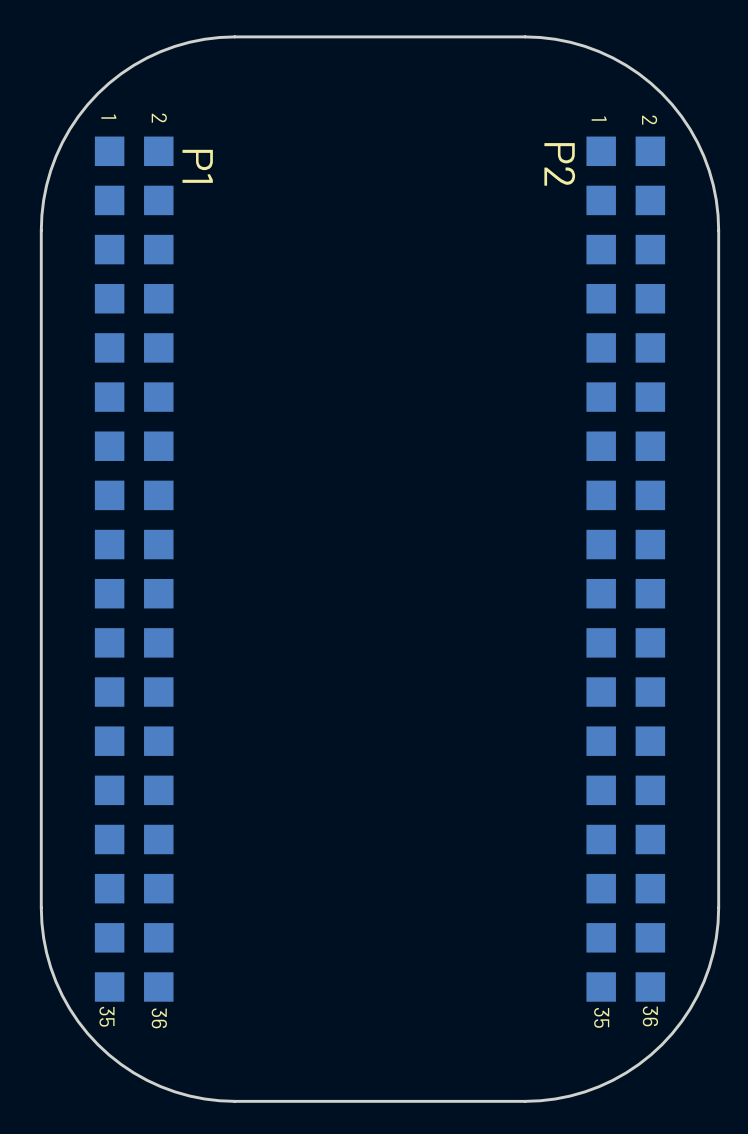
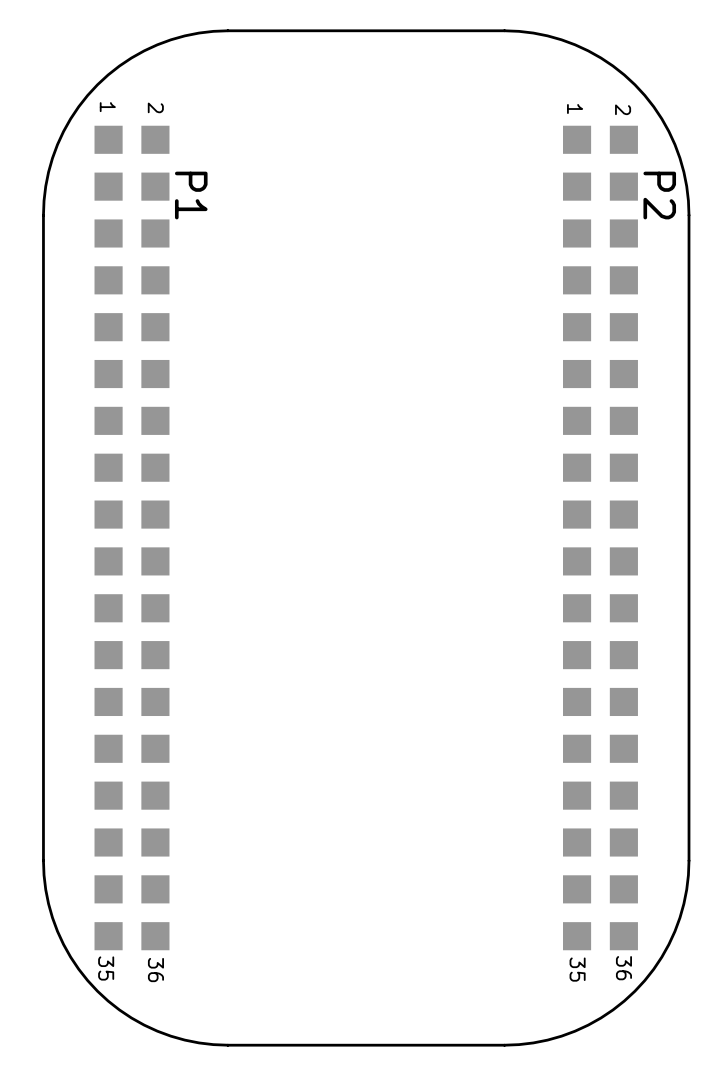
P2 name position: P2 (559, 164) -> P2 (659, 195)
P1 name position: P1 (197, 166) -> P1 (191, 195)

